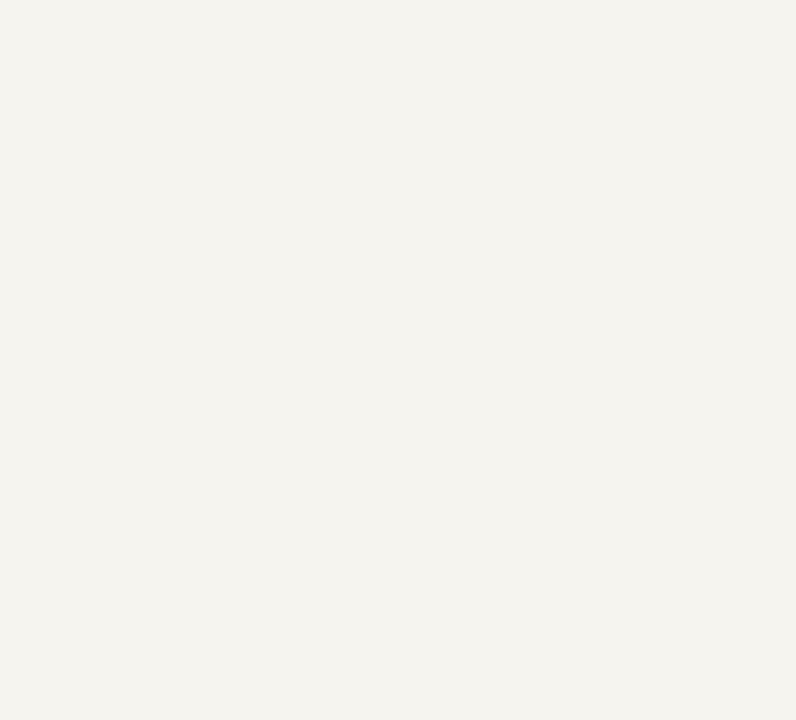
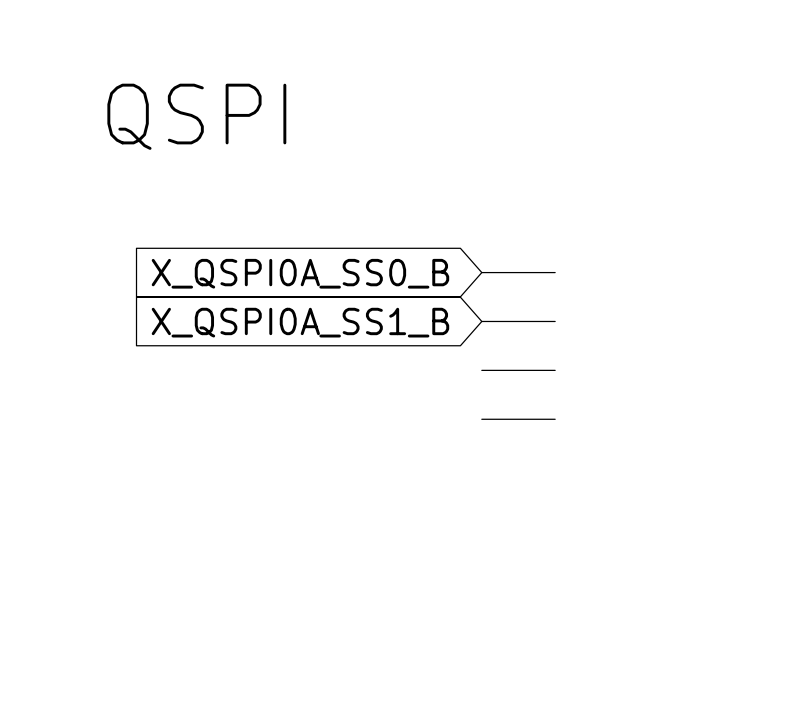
text: none -> QSPI (196, 116)
wire: none -> (481, 272) (555, 272)
global label: none -> X_QSPI0A_SS0_B (300, 273)
wire: none -> (481, 321) (555, 321)
global label: none -> X_QSPI0A_SS1_B (300, 322)
wire: none -> (481, 370) (555, 370)
wire: none -> (481, 419) (555, 419)

